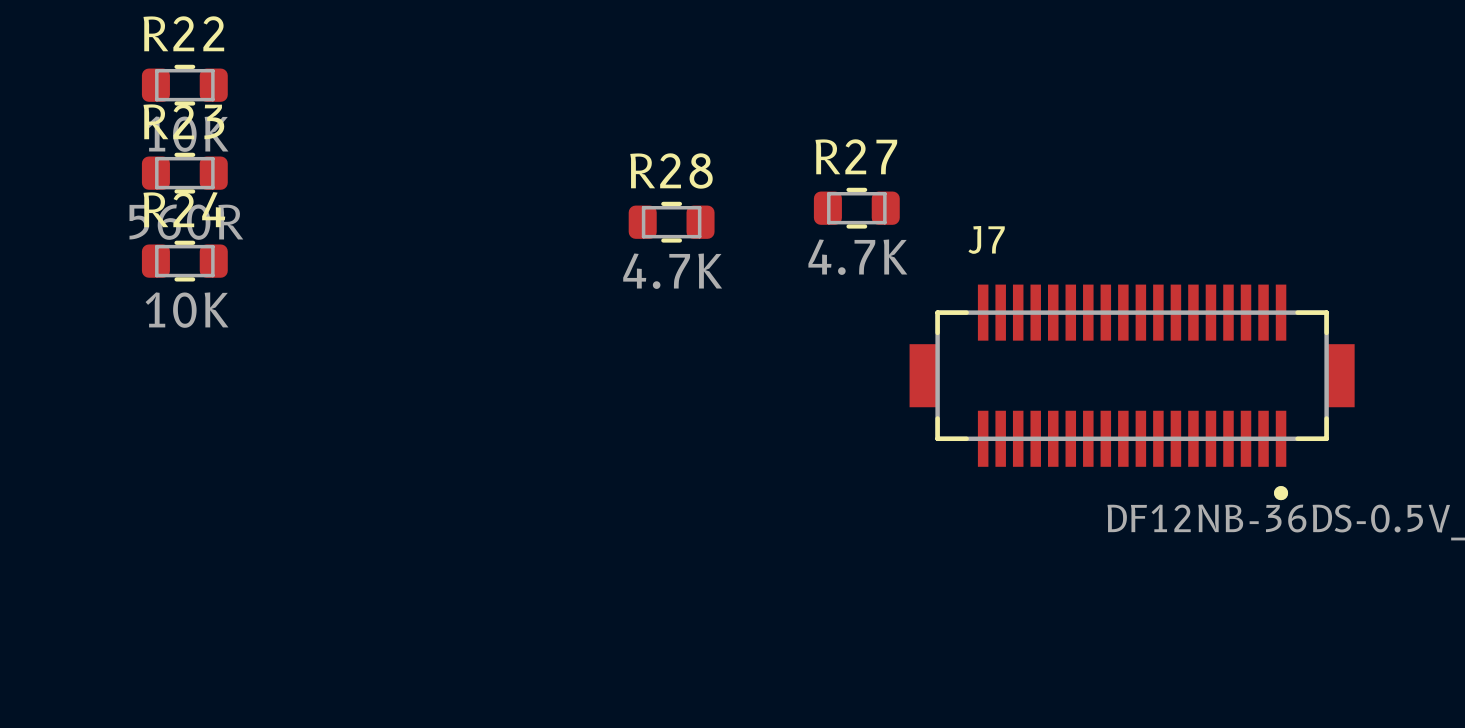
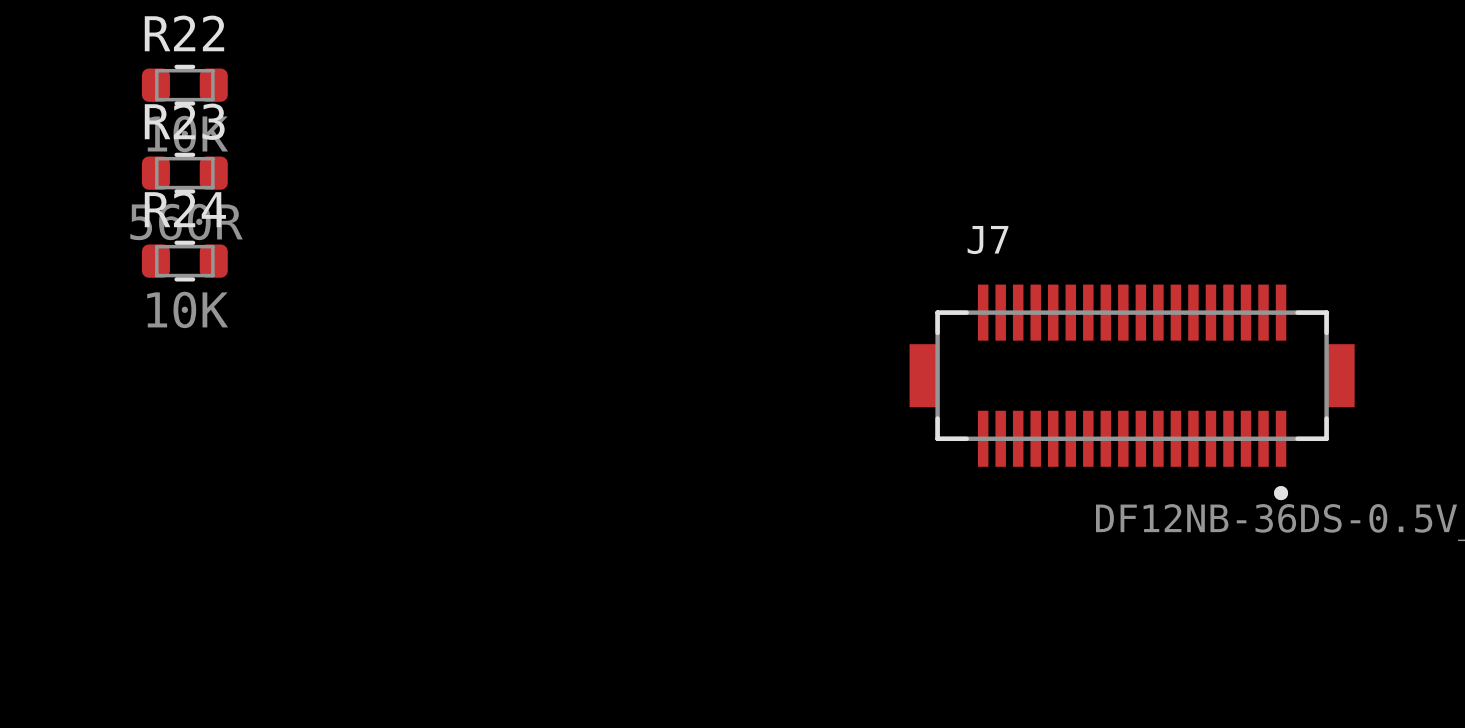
R27: 4.7K (856, 208) -> none
R28: 4.7K (671, 222) -> none

